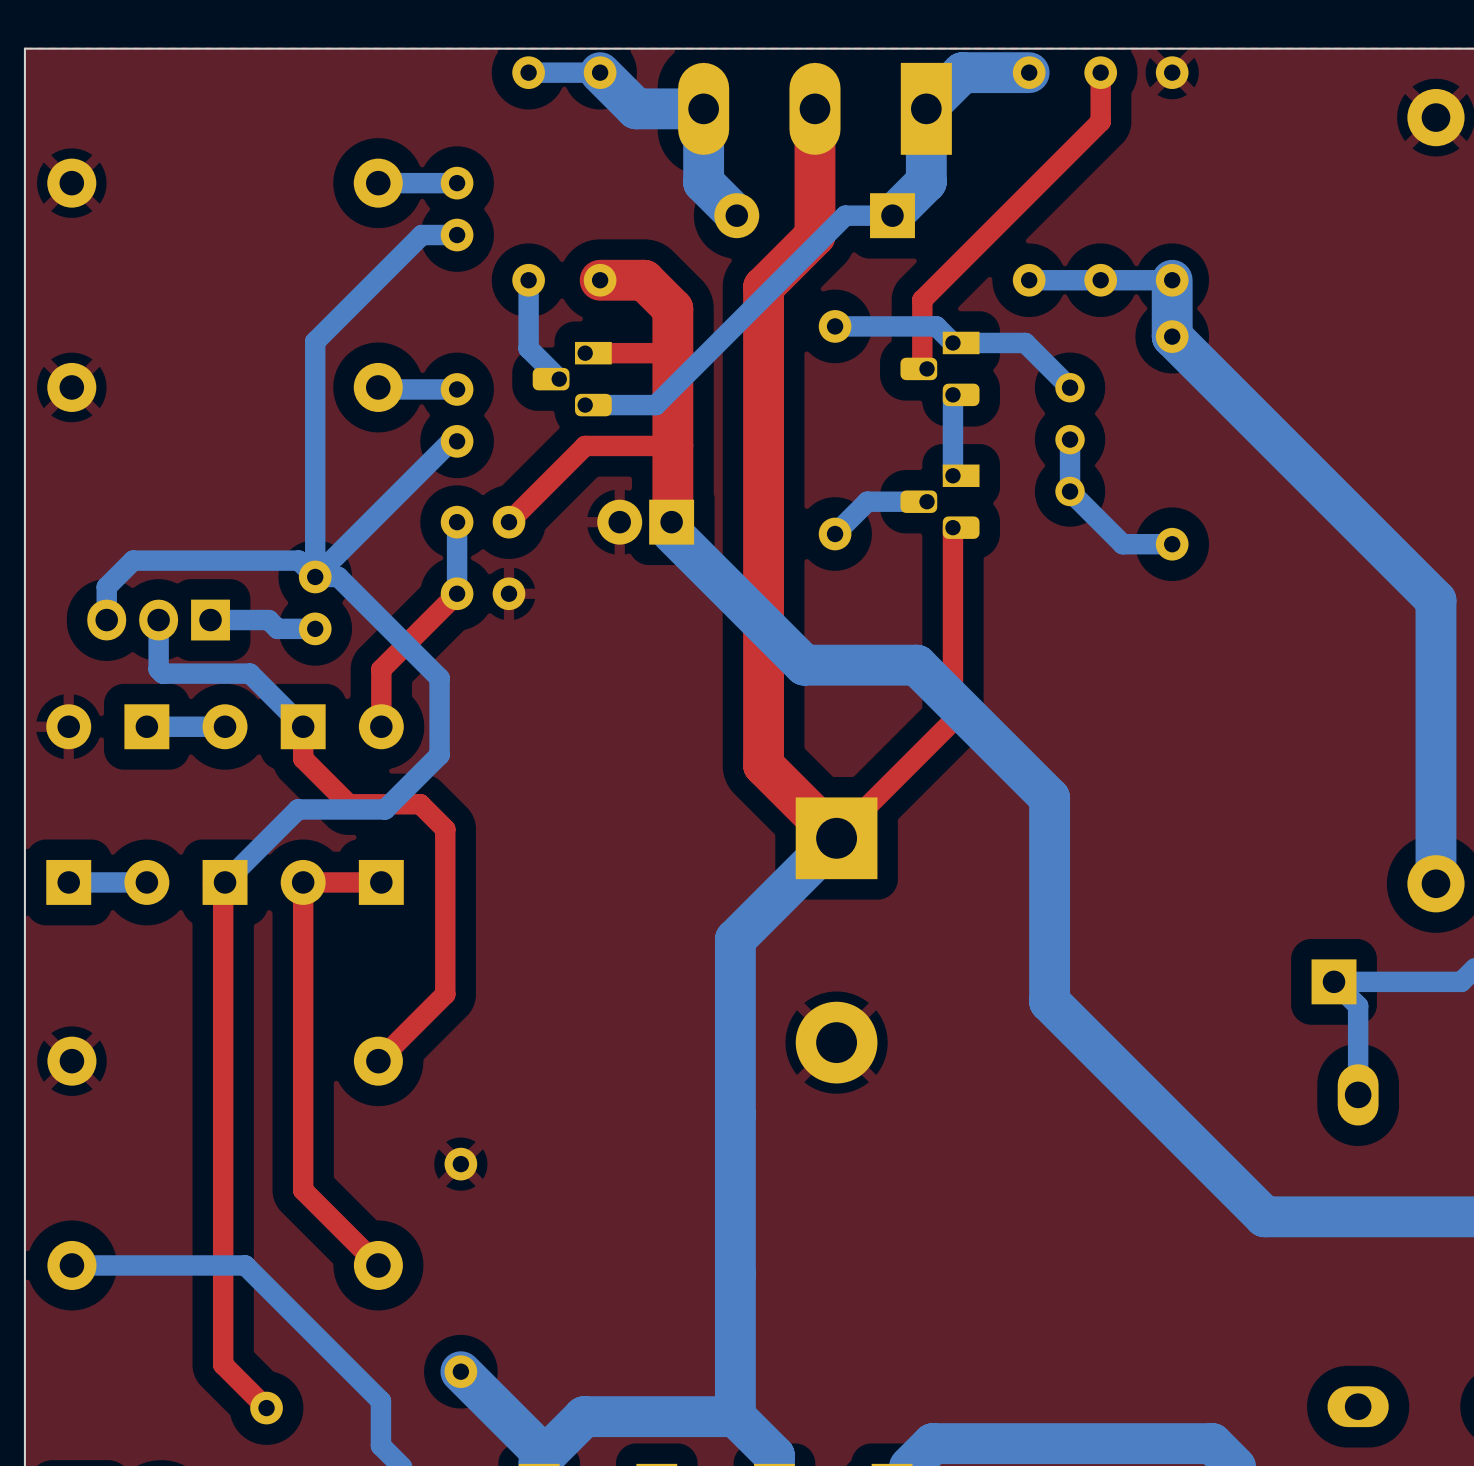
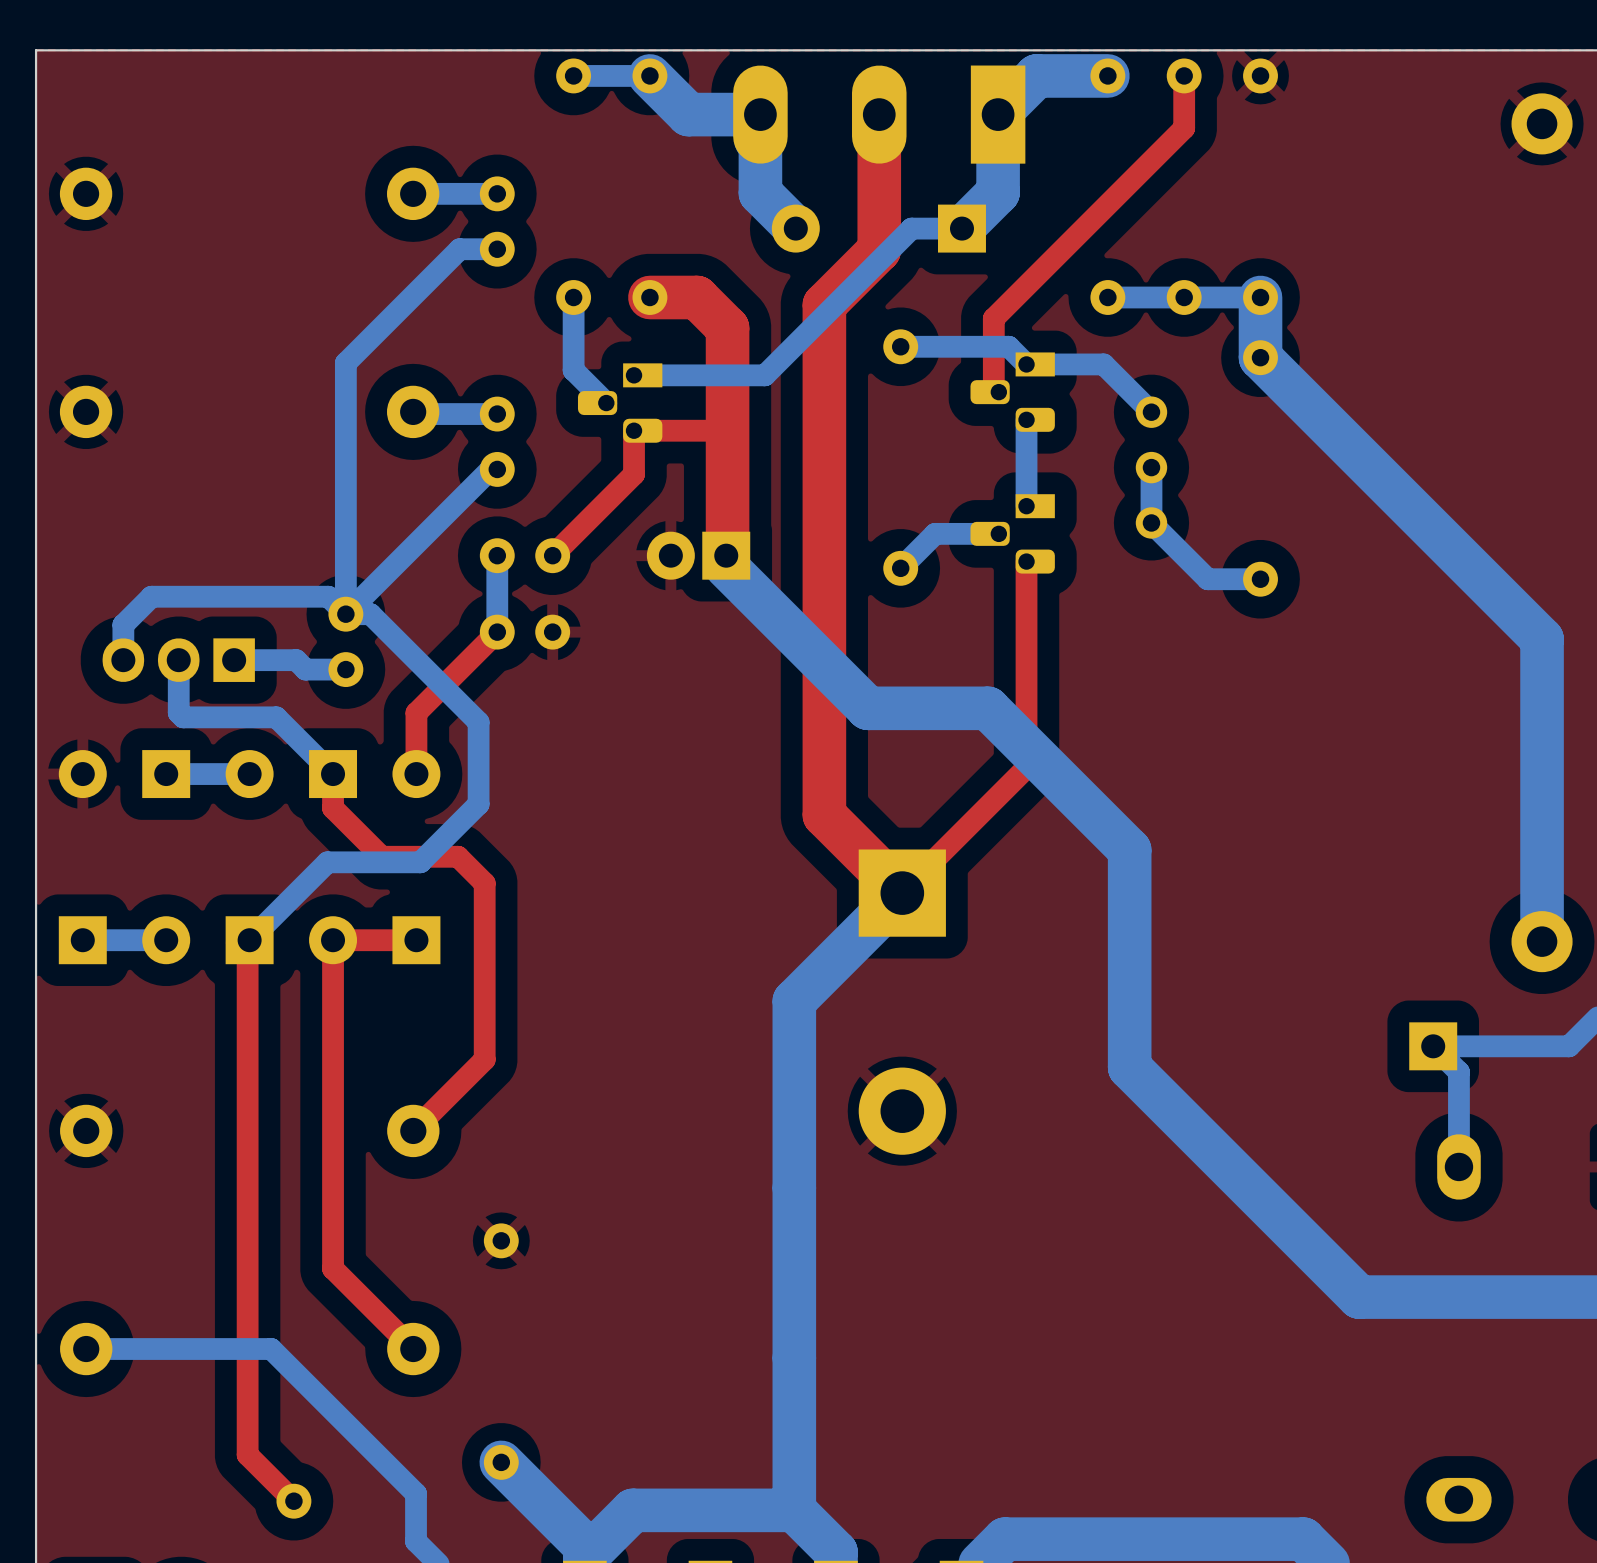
top track: (672, 353) (585, 353) -> none
bottom track: (707, 353) (655, 405) (585, 405) -> (764, 375) (634, 375)
top track: (672, 445) (585, 445) -> (721, 430) (634, 430) (634, 474)

